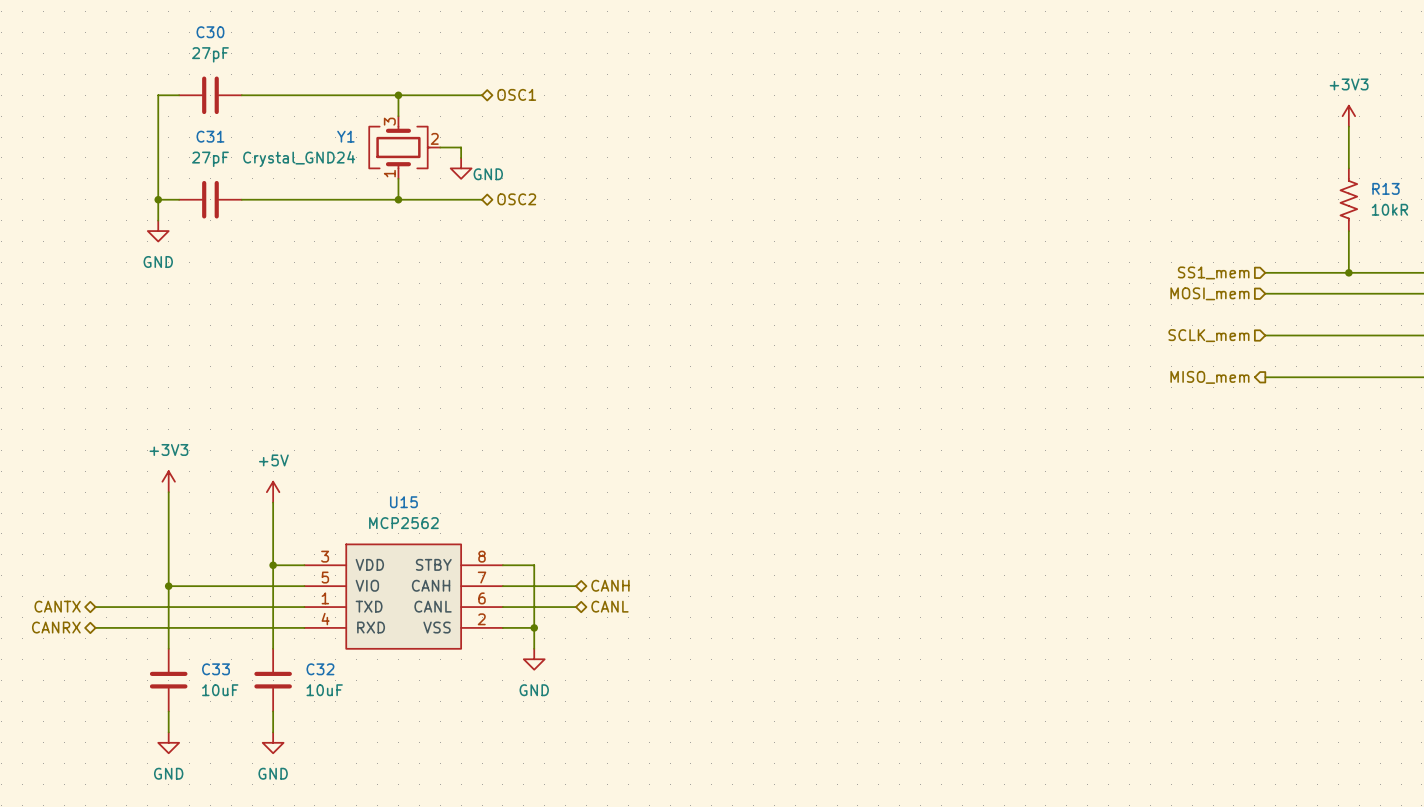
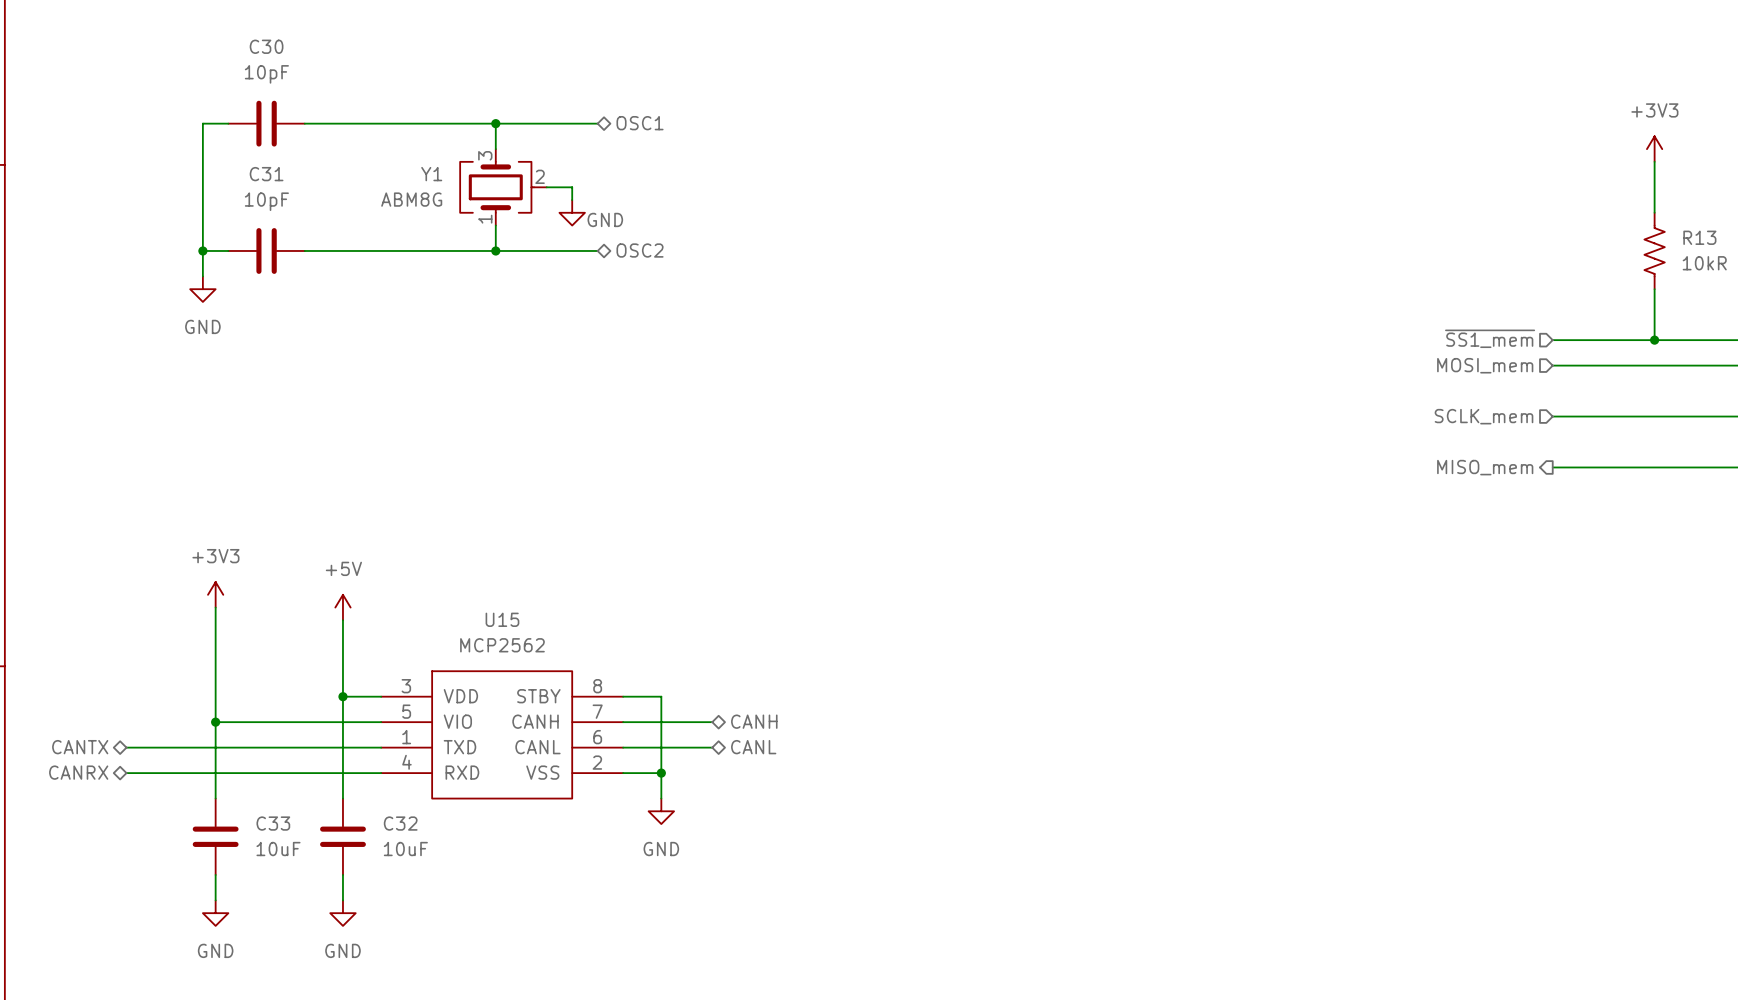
C30 value: 27pF (210, 54) -> 10pF (266, 74)
C31 value: 27pF (210, 159) -> 10pF (266, 201)
Y1 value: Crystal_GND24 (299, 159) -> ABM8G (411, 199)
hierarchical label: SS1_mem (1213, 272) -> ~{SS1_mem} (1490, 338)

